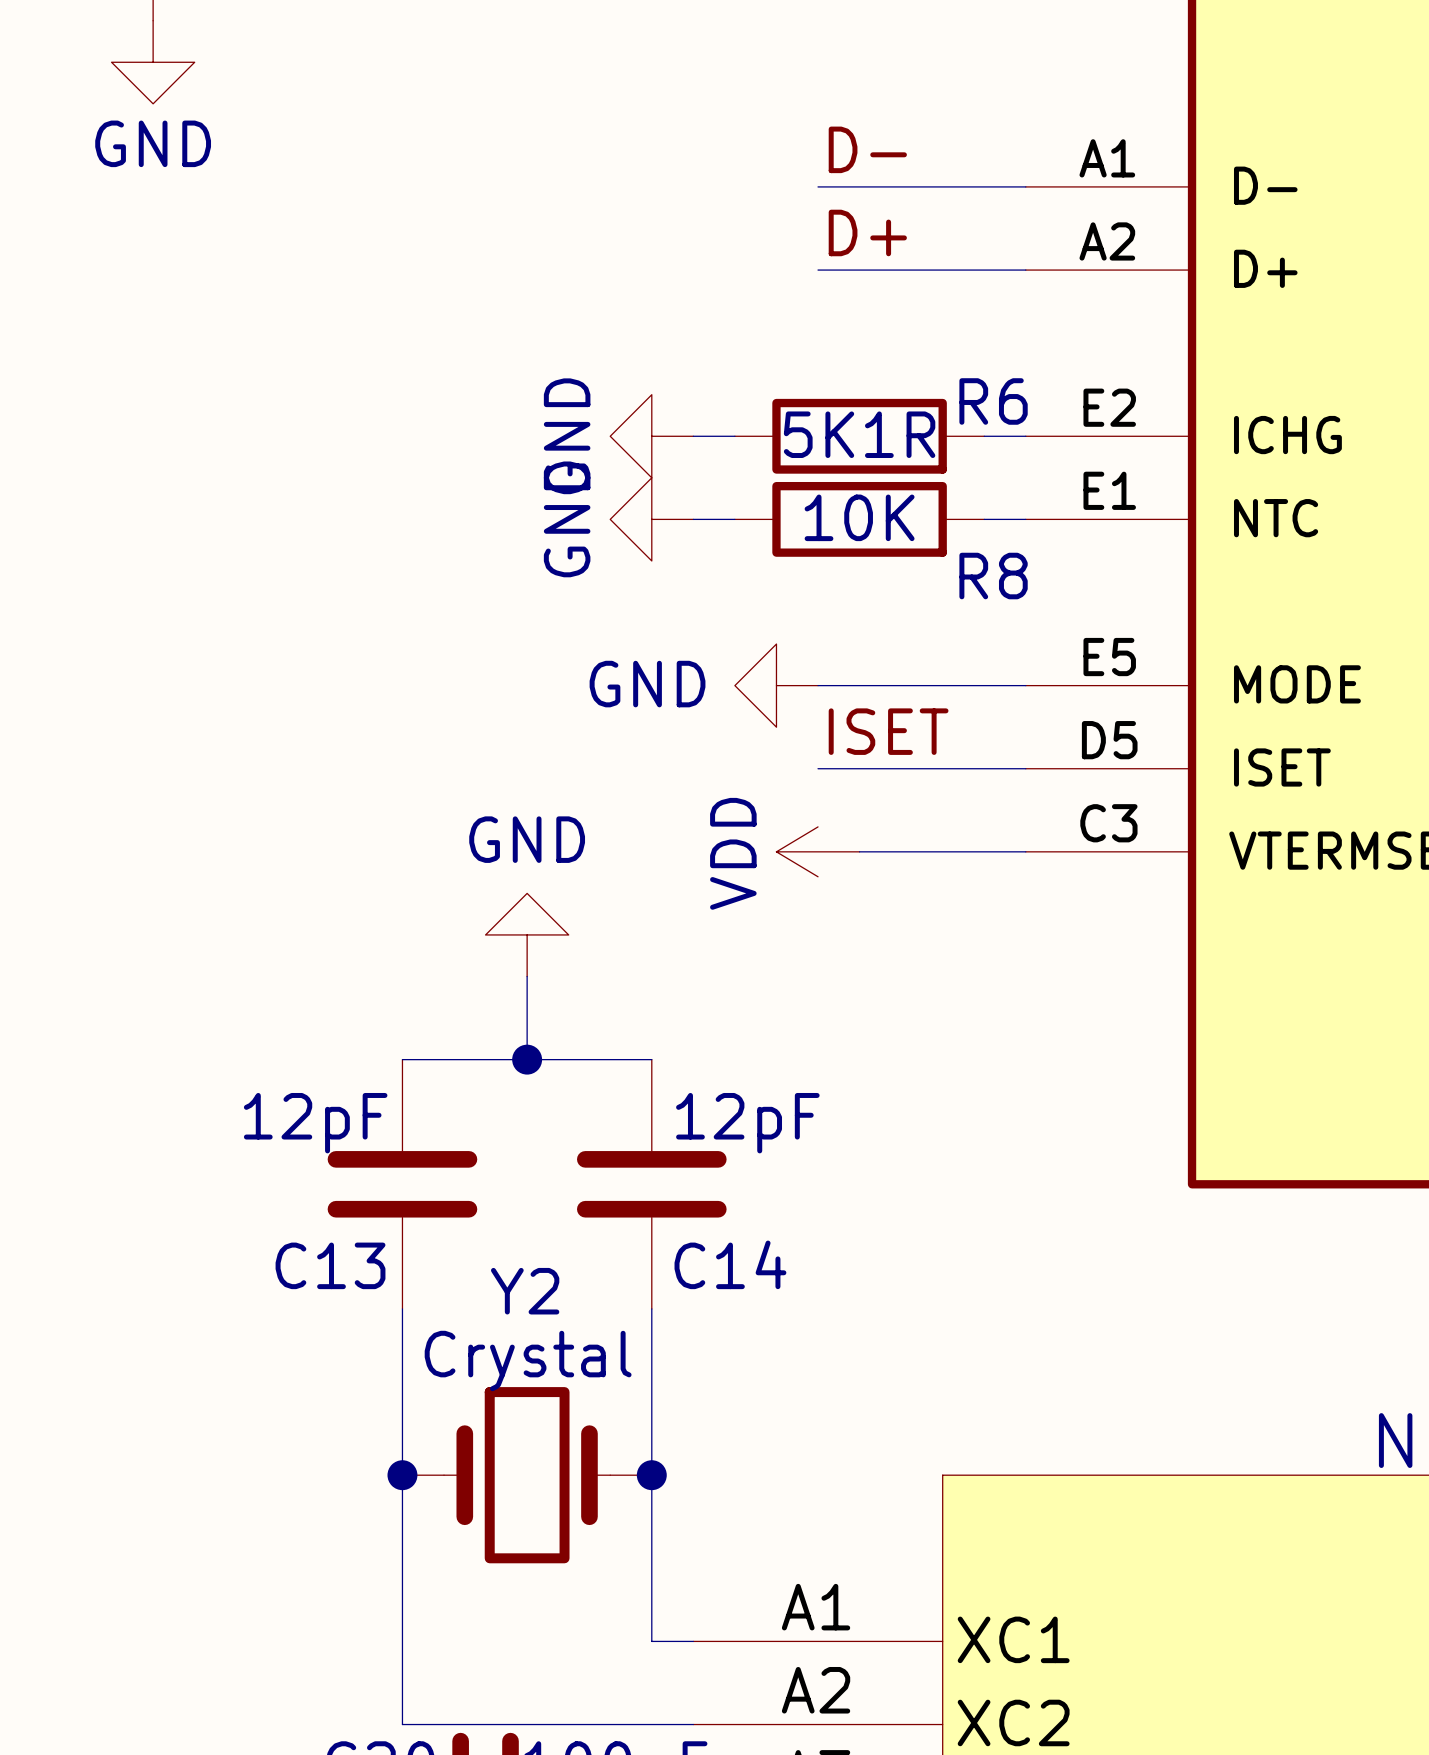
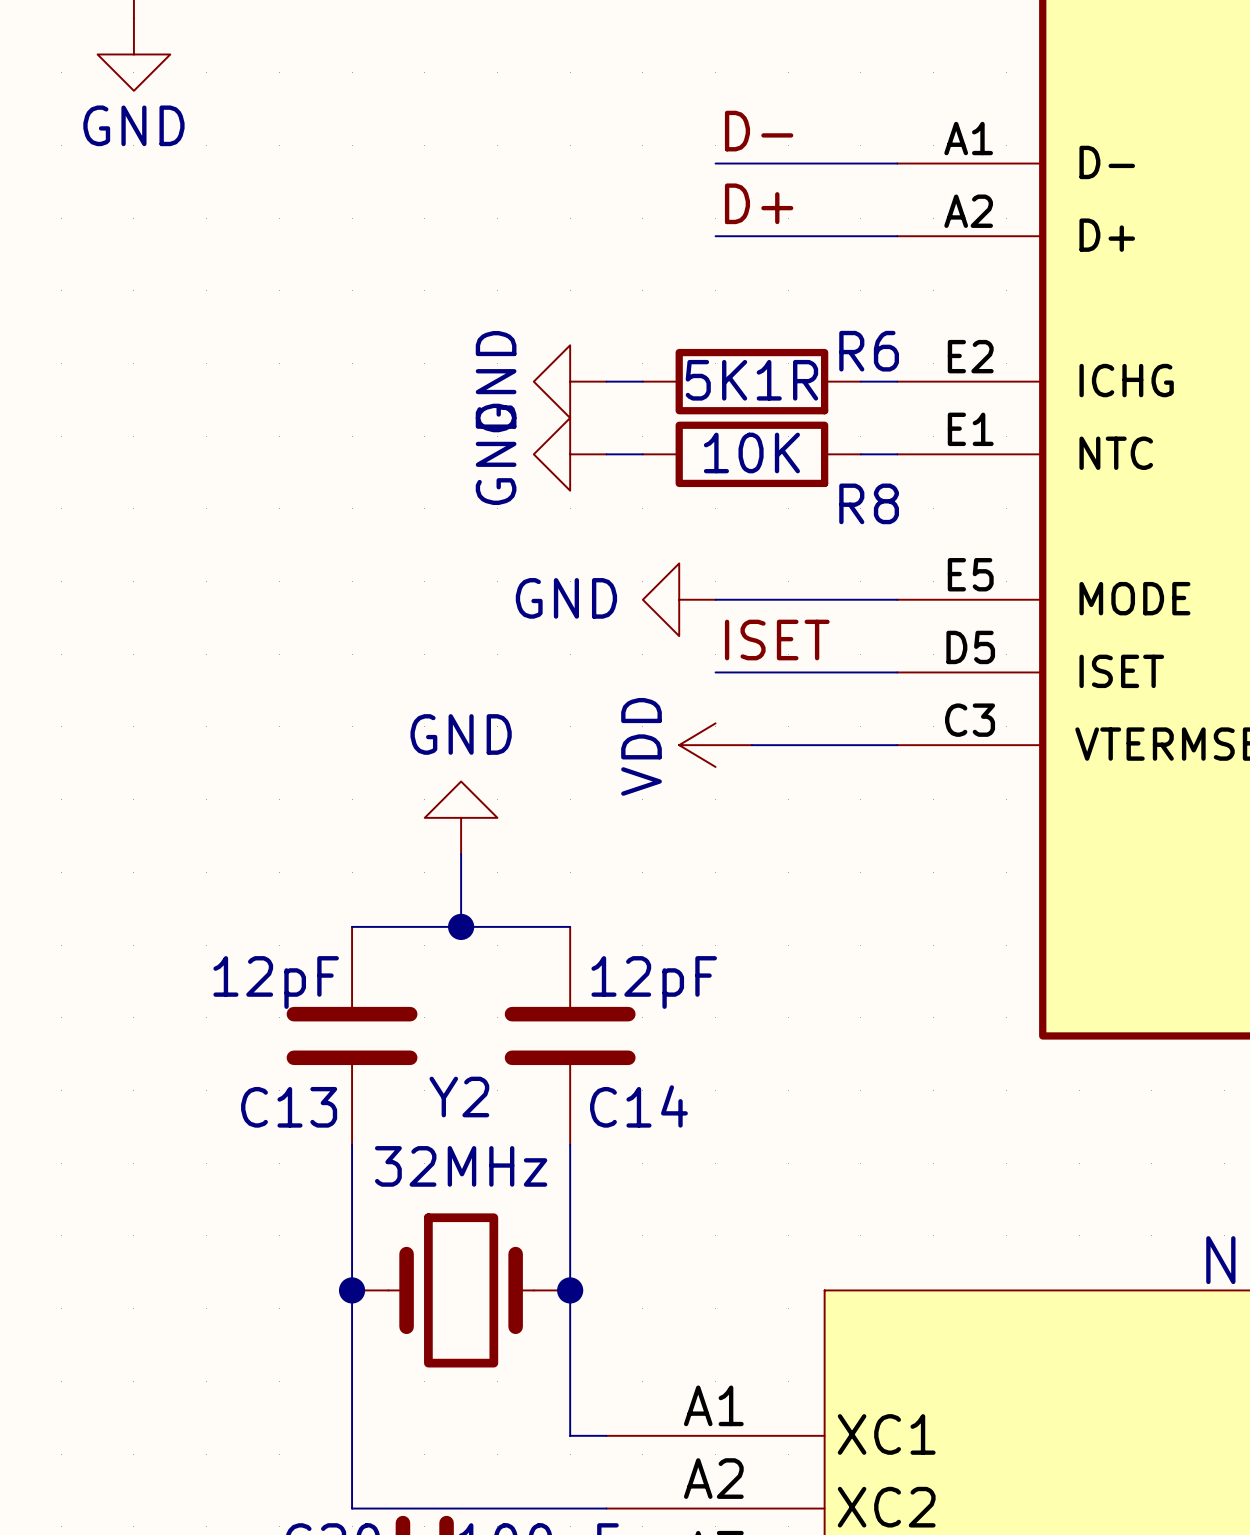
Y2 name position: Y2 (525, 1291) -> Y2 (459, 1097)
Y2 value: Crystal (528, 1360) -> 32MHz (461, 1166)

